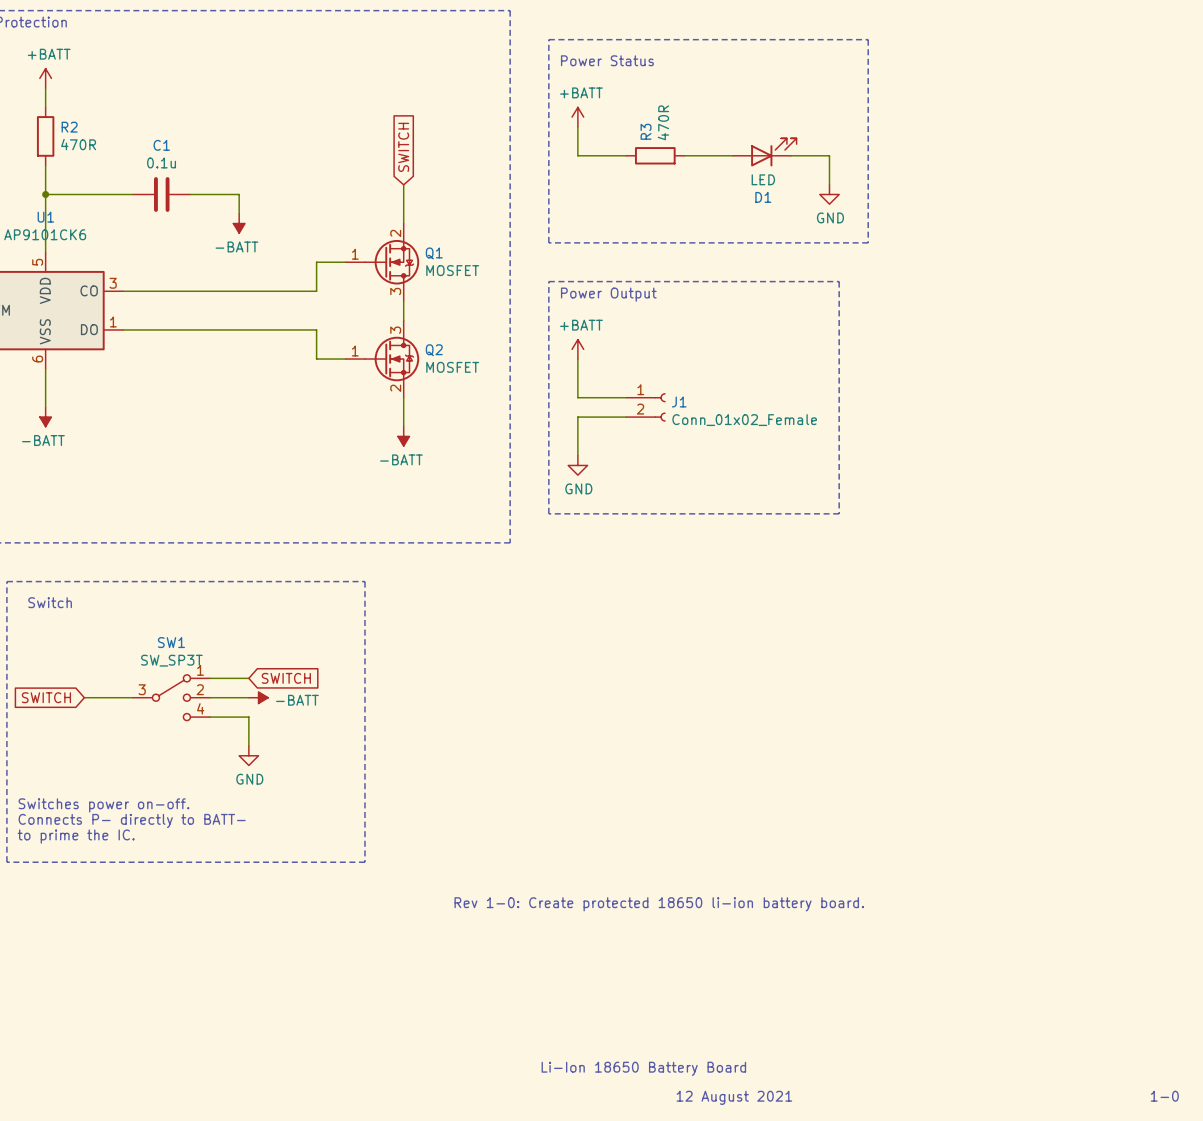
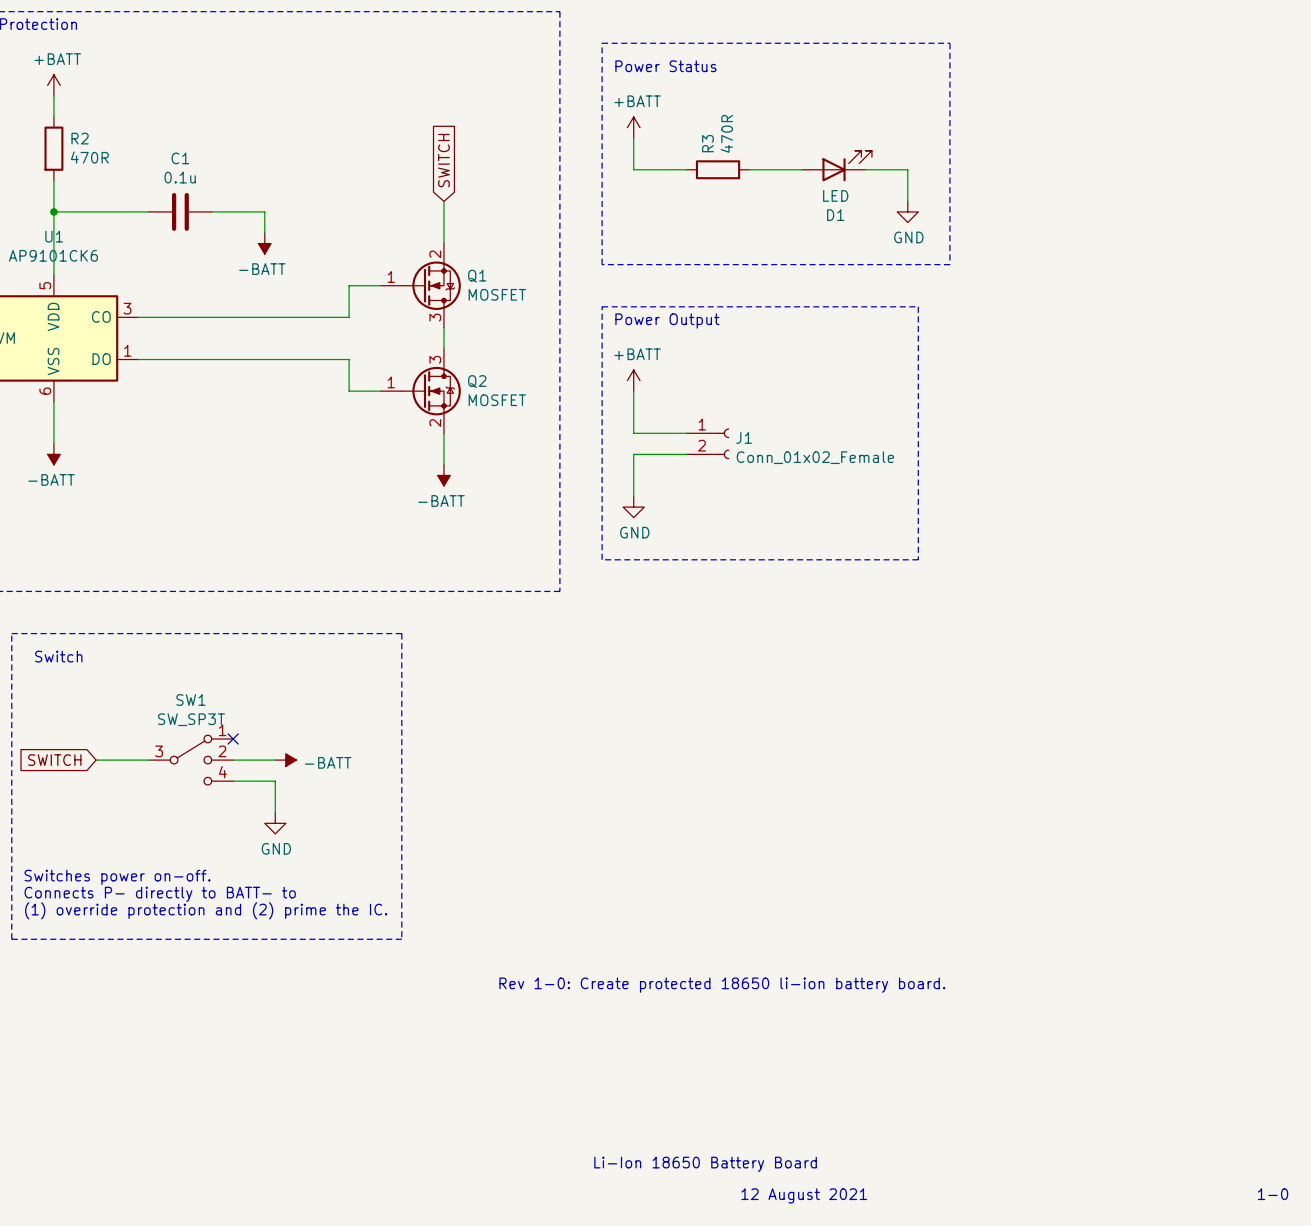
wire: (210, 678) (248, 678) -> none
no-connect mark: none -> (233, 739)
global label: SWITCH (286, 678) -> none
text: Connects P- directly to BATT- (132, 820) -> Connects P- directly to BATT- to (160, 894)
text: to prime the IC. (76, 836) -> (1) override protection and (2) prime the IC. (206, 910)

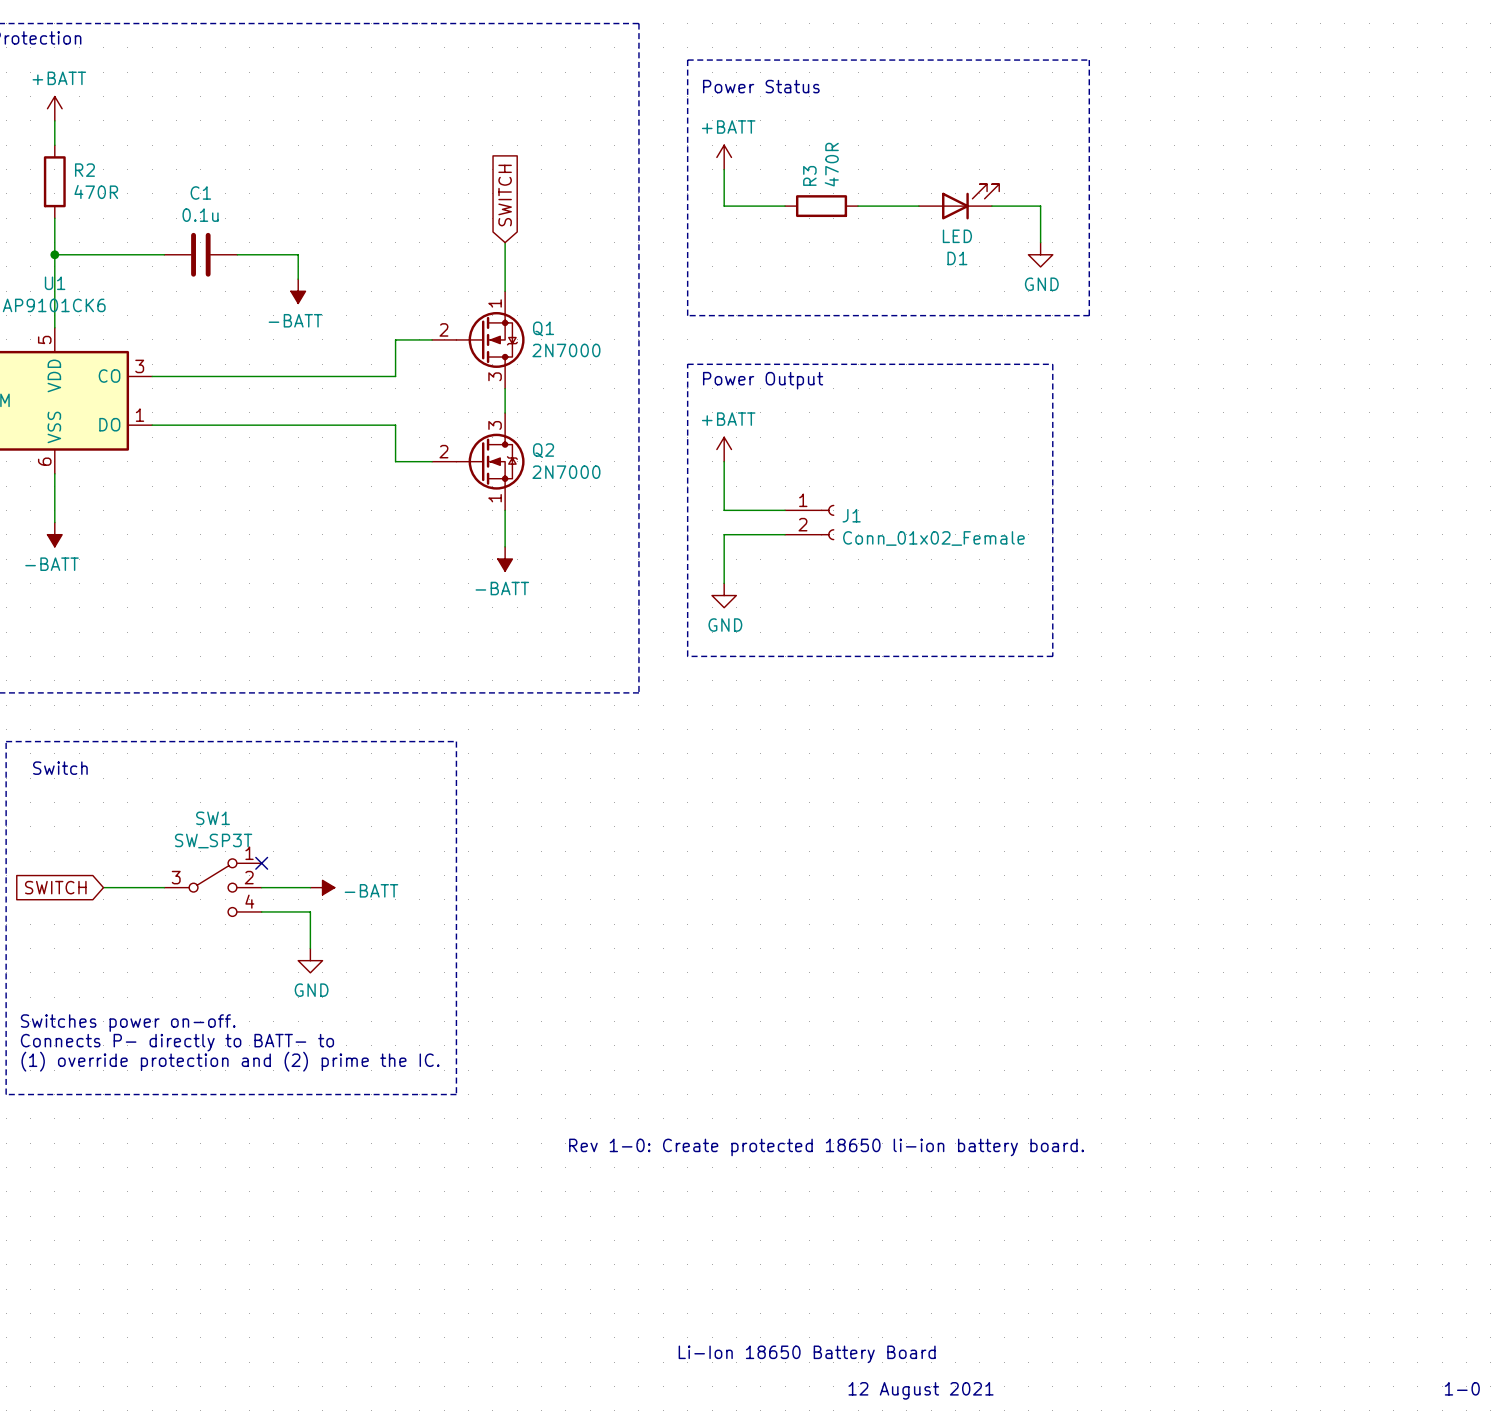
Q1 pin number: 2 (435, 254) -> 1 (495, 303)
Q1 pin number: 1 (391, 277) -> 2 (443, 329)
Q1 value: MOSFET (497, 294) -> 2N7000 (566, 350)
Q2 pin number: 1 (391, 382) -> 2 (443, 451)
Q2 value: MOSFET (497, 400) -> 2N7000 (566, 472)
Q2 pin number: 2 (435, 423) -> 1 (495, 498)

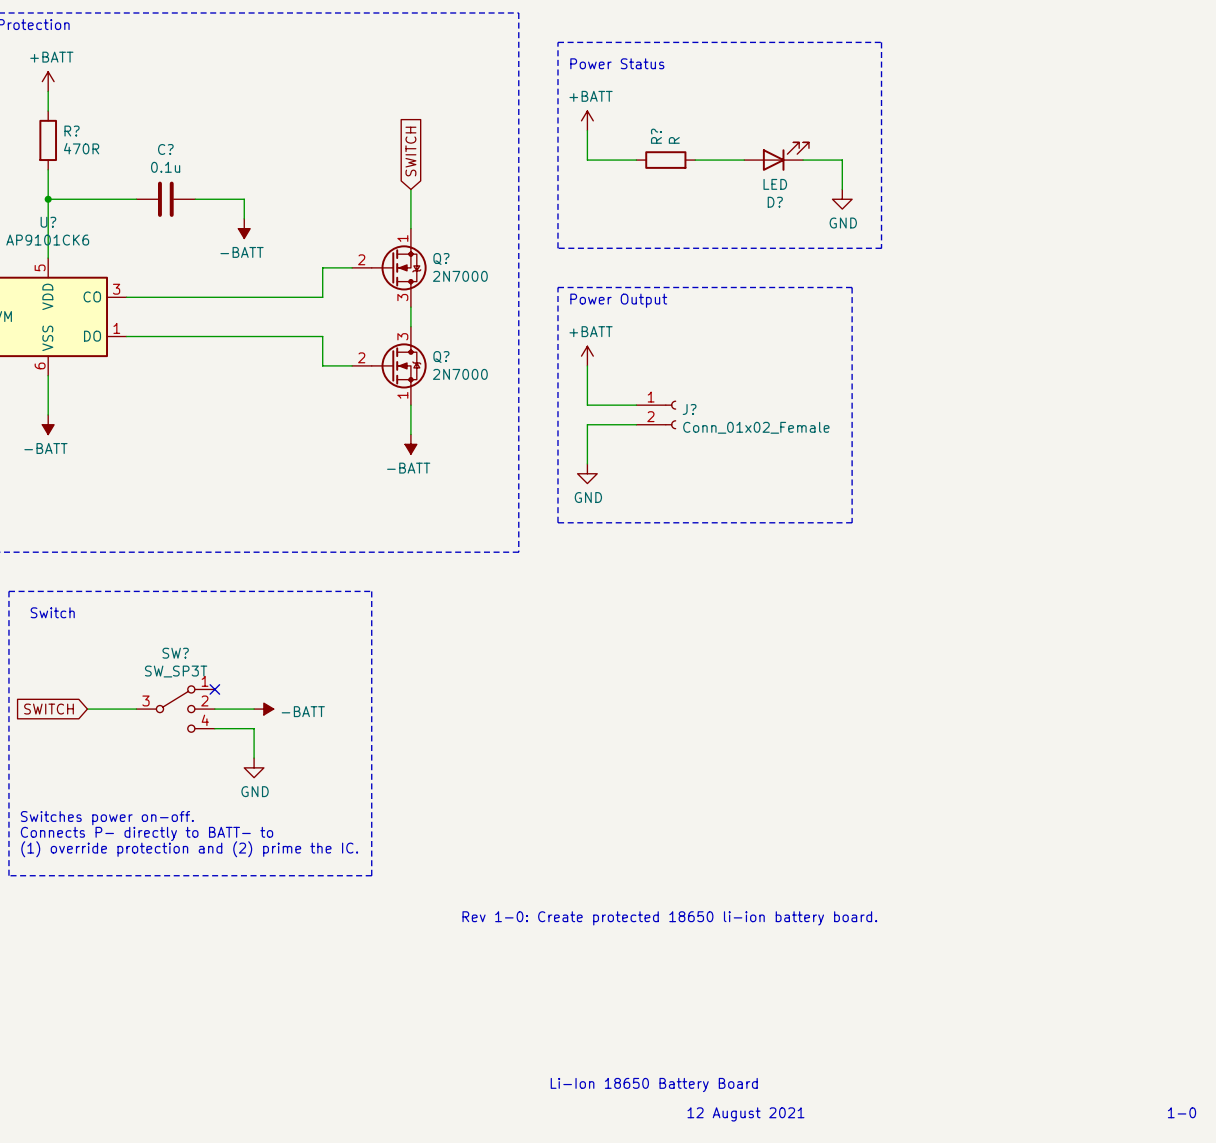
R3 value: 470R (831, 164) -> R (674, 140)
R2 name: R2 (84, 170) -> R? (72, 131)
R3 name: R3 (809, 175) -> R? (656, 136)
C1 name: C1 (200, 192) -> C? (165, 149)
D1 name: D1 (957, 258) -> D? (775, 202)
U1 name: U1 (55, 283) -> U? (48, 222)
Q1 name: Q1 (543, 328) -> Q? (441, 258)
Q2 name: Q2 (543, 450) -> Q? (441, 357)
J1 name: J1 (851, 515) -> J? (689, 409)
SW1 name: SW1 (213, 818) -> SW? (175, 653)

